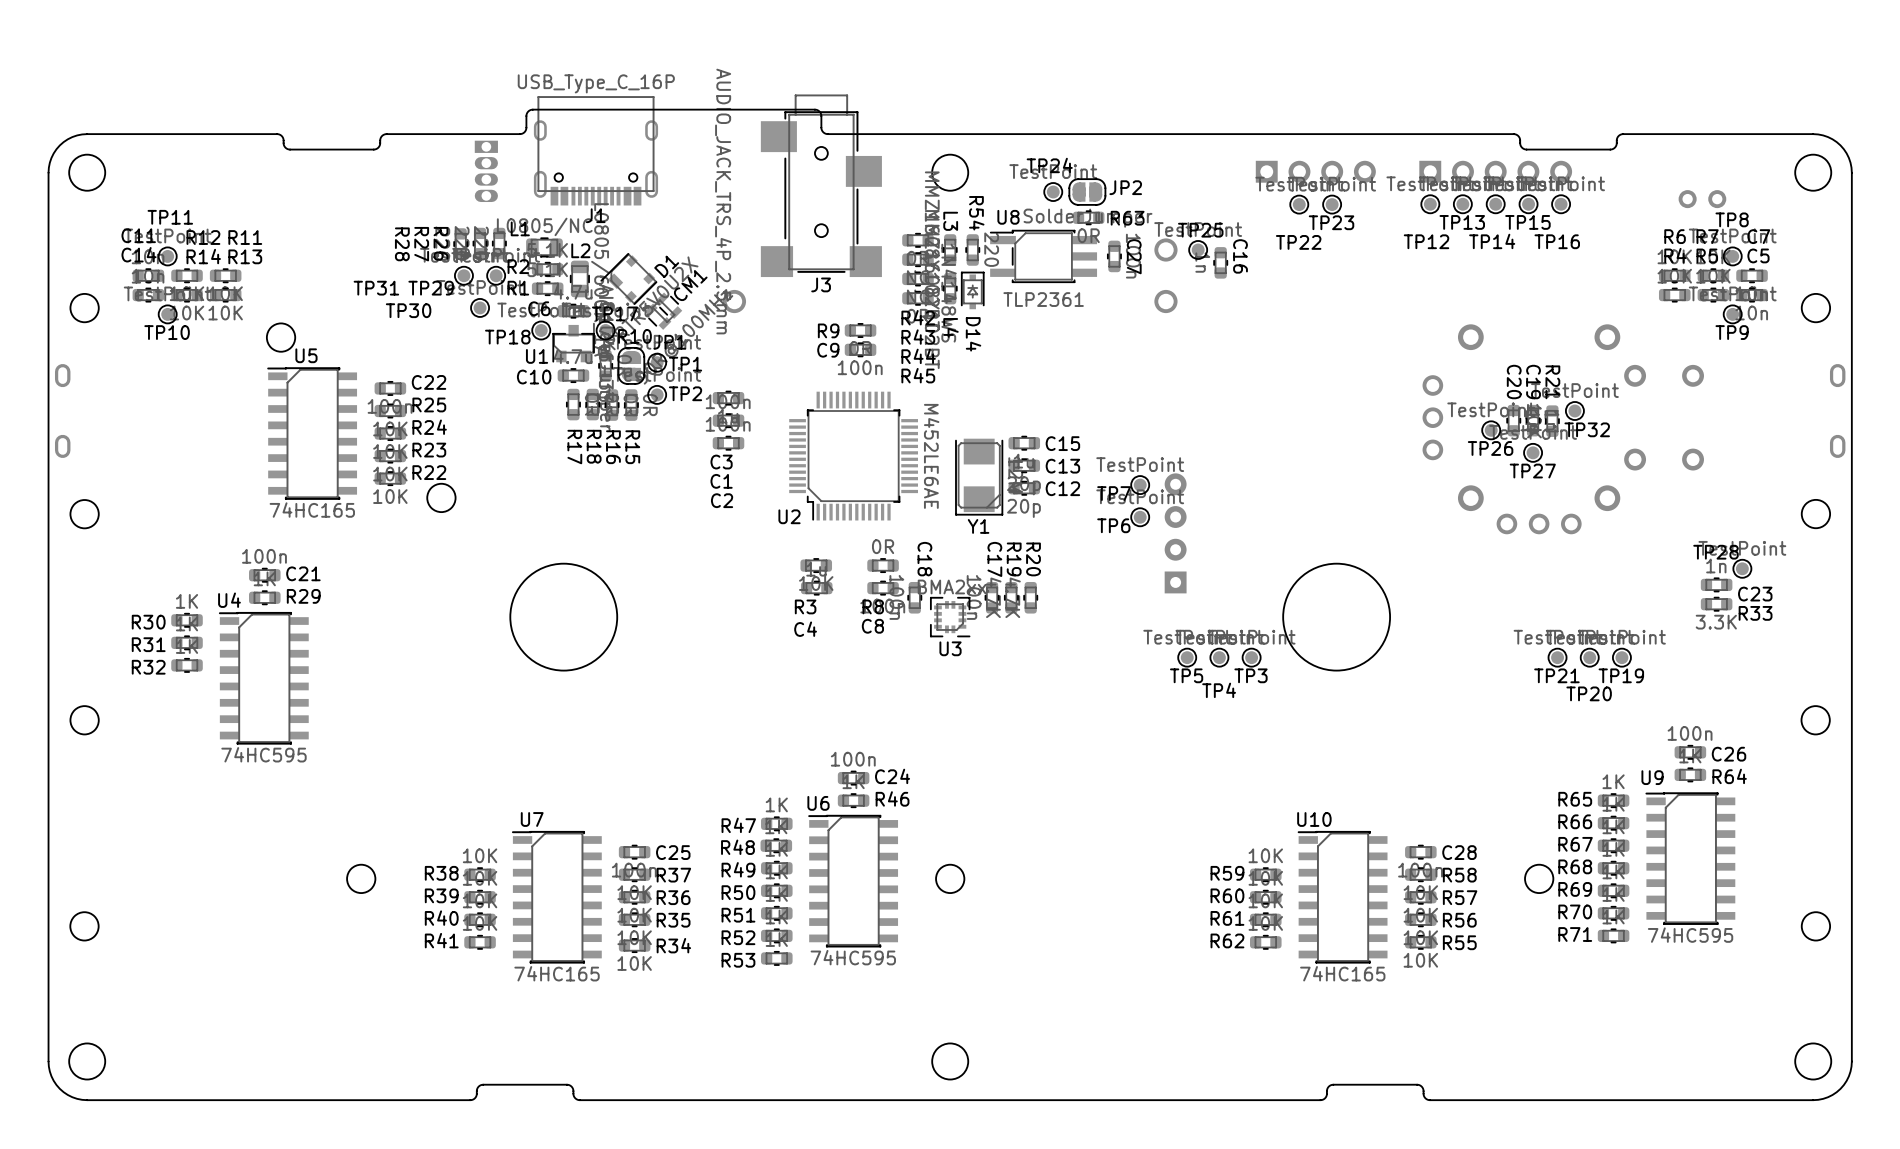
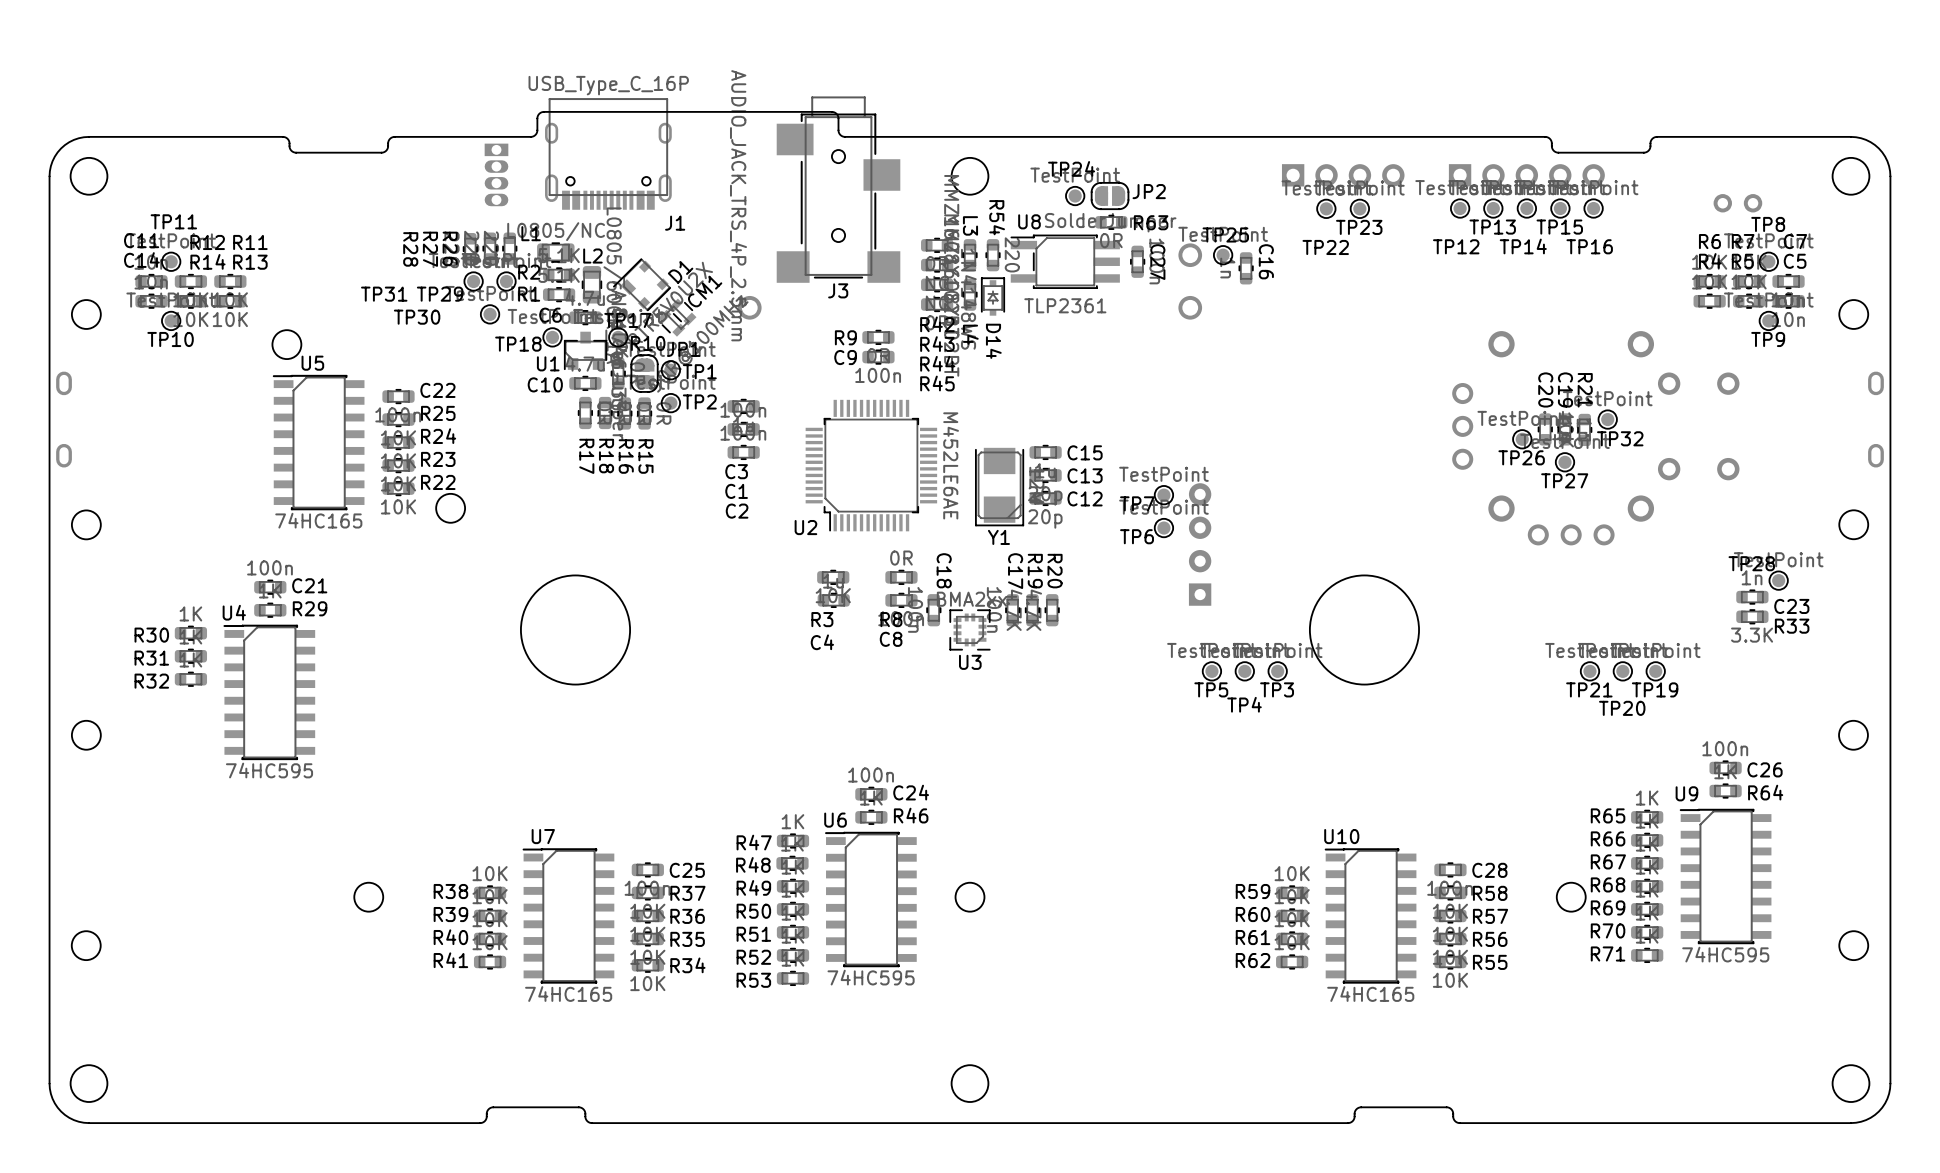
J1 name position: J1 (595, 215) -> J1 (675, 223)

